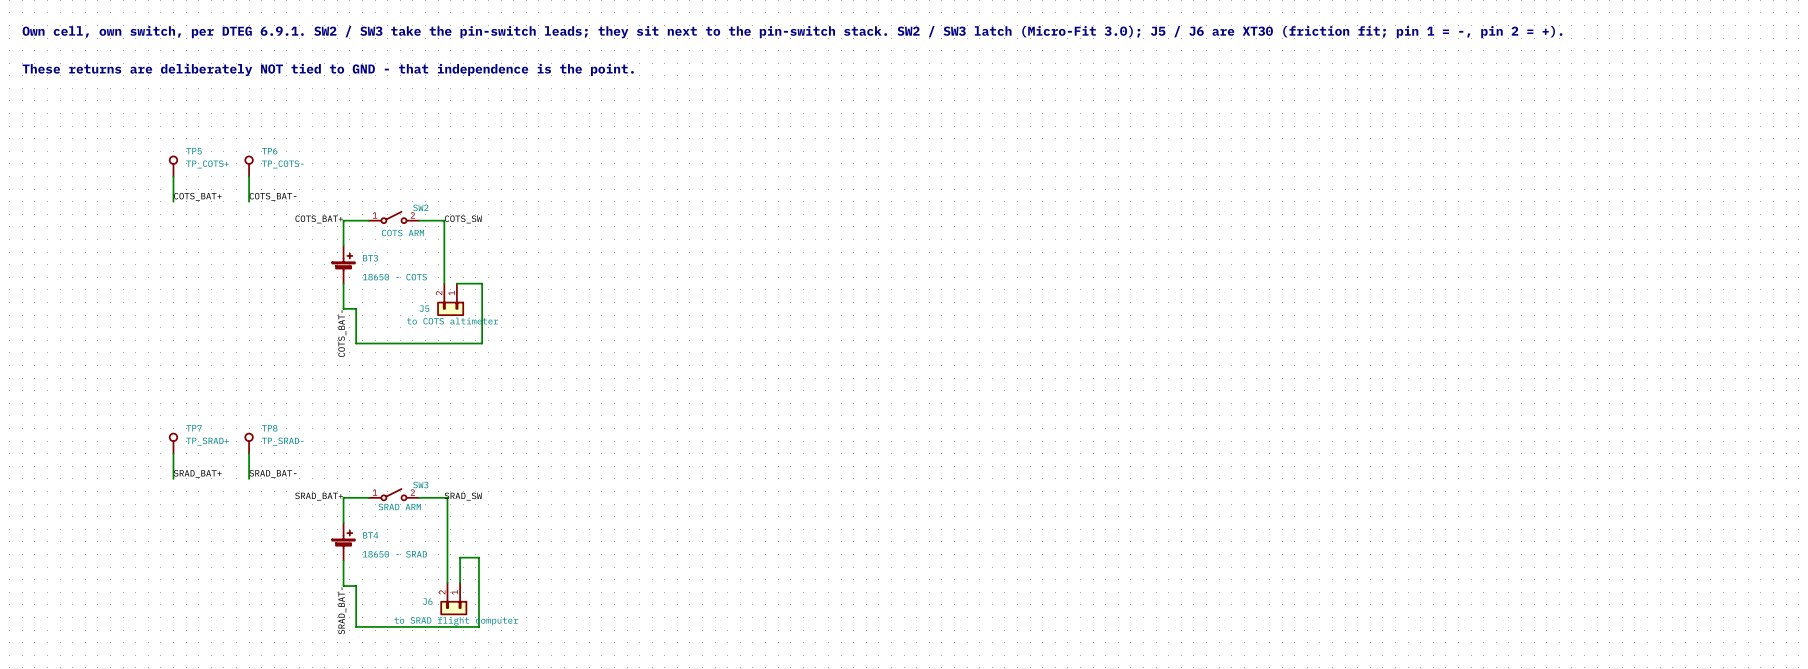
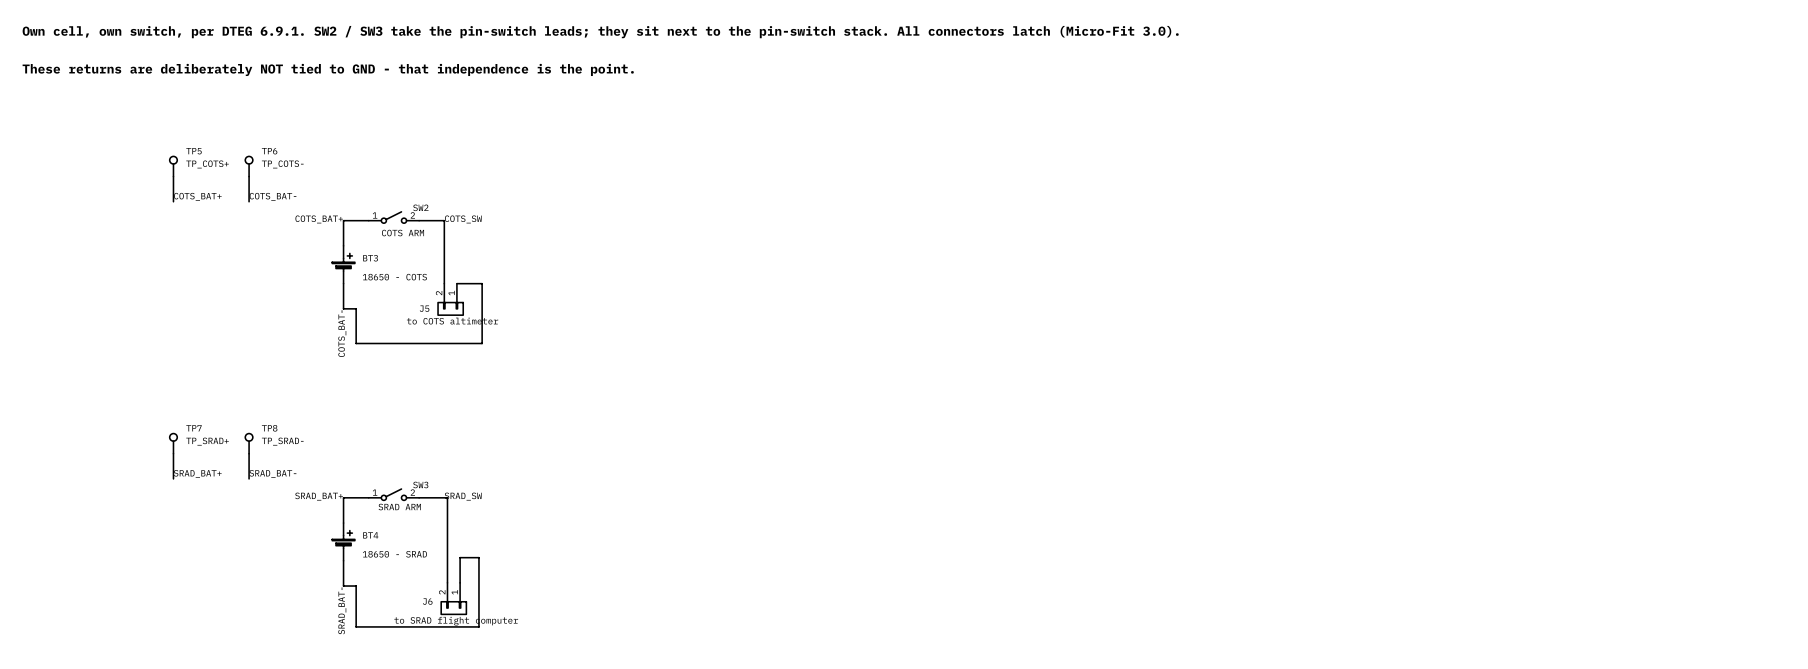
text: Own cell, own switch, per DTEG 6.9.1. SW2 / SW3 take the pin-switch leads; they sit next to the pin-switch stack. SW2 / SW3 latch (Micro-Fit 3.0); J5 / J6 are XT30 (friction fit; pin 1 = -, pin 2 = +). (792, 32) -> Own cell, own switch, per DTEG 6.9.1. SW2 / SW3 take the pin-switch leads; they sit next to the pin-switch stack. All connectors latch (Micro-Fit 3.0). (600, 32)

